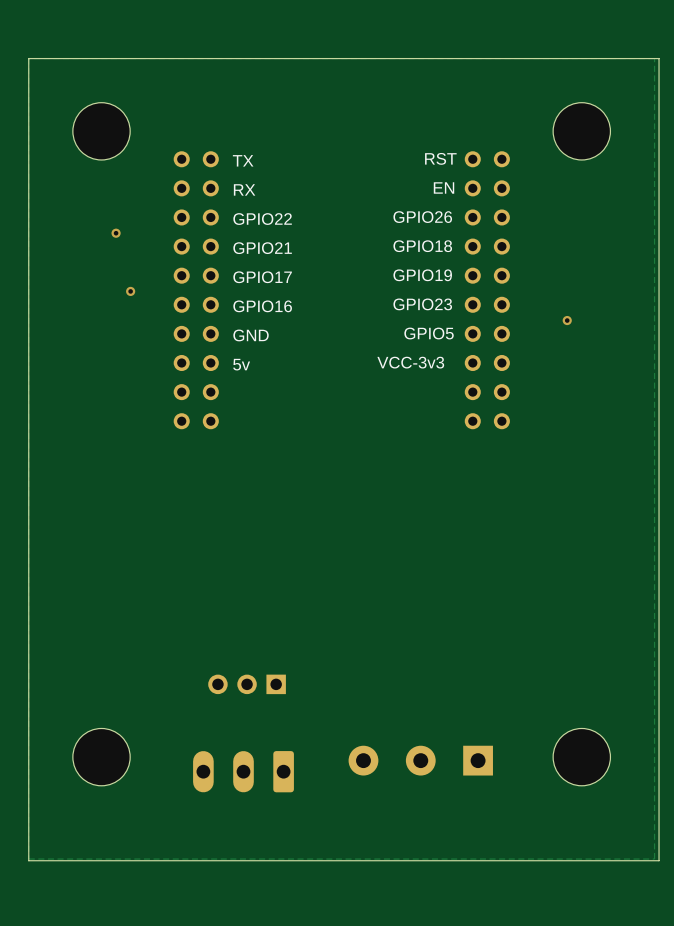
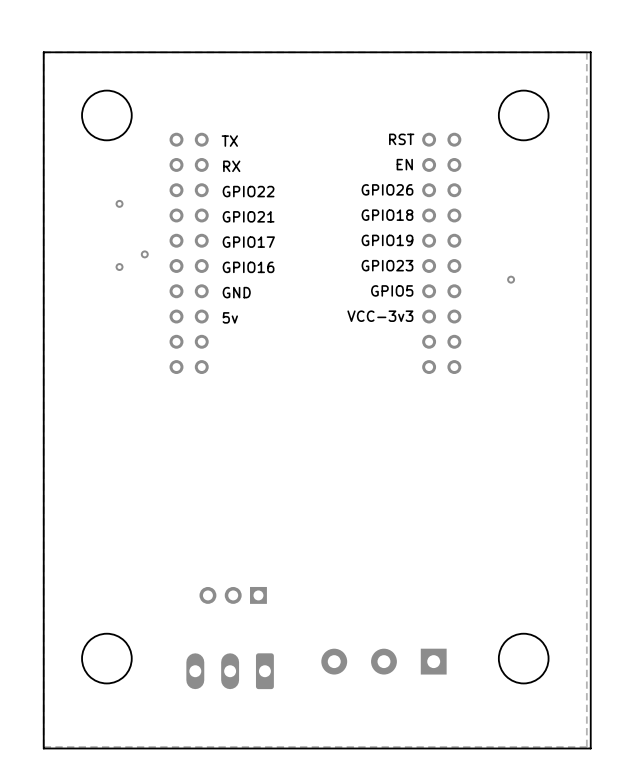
via: (130, 291) -> none
via: none -> (144, 254)
via: none -> (119, 267)

